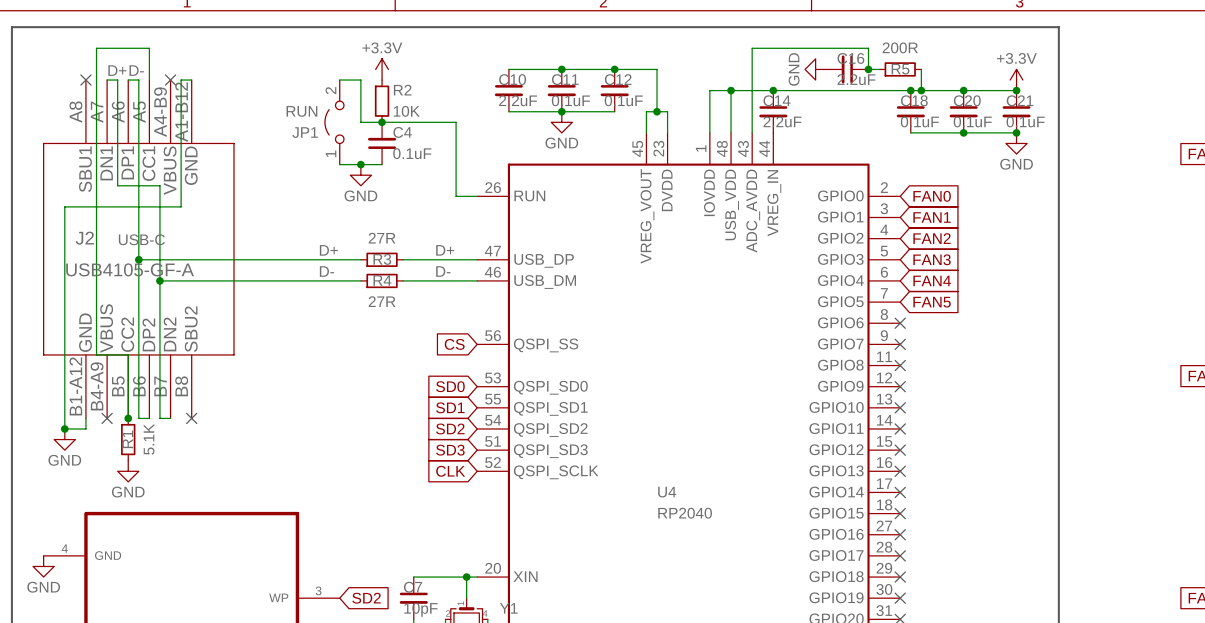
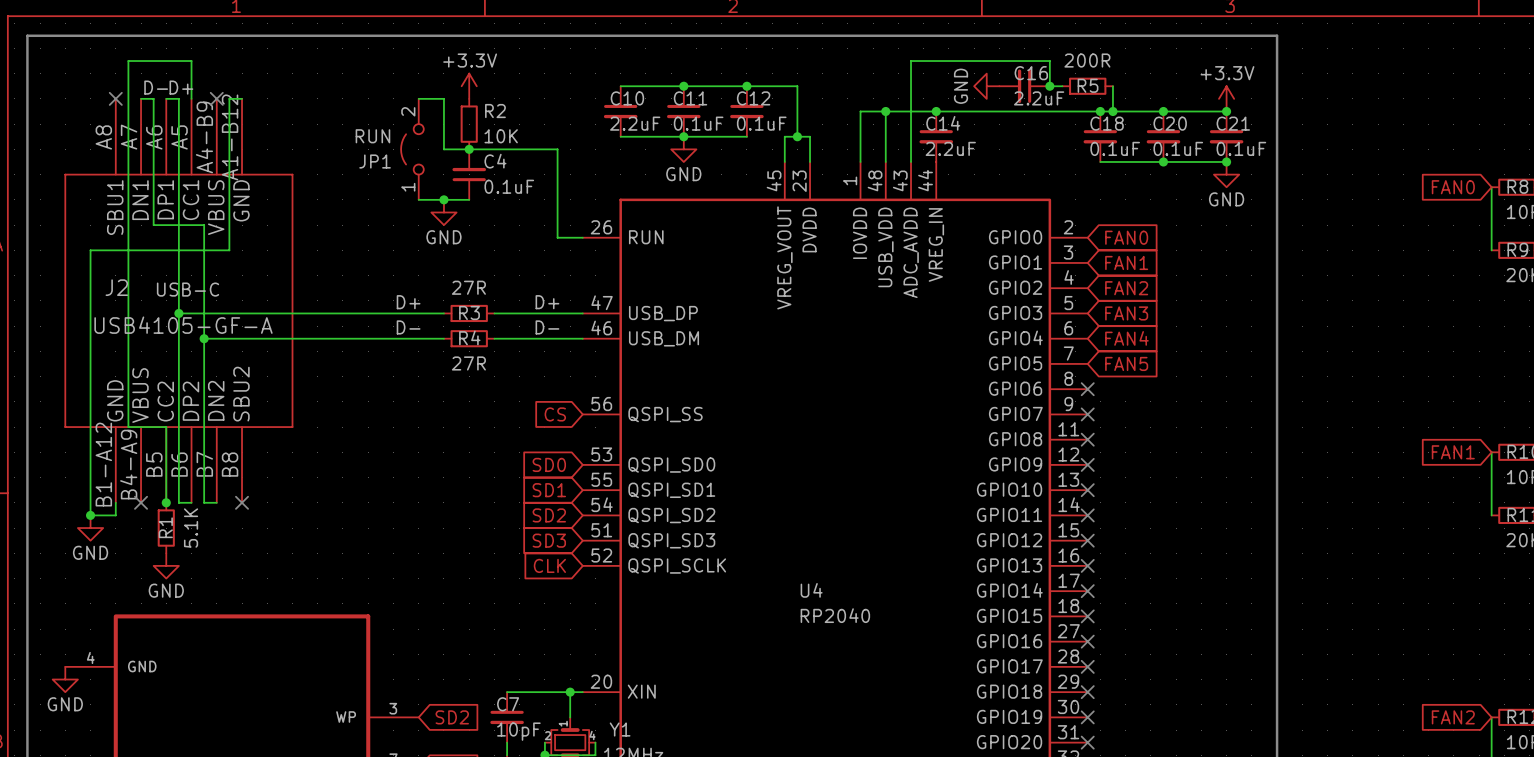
label: D+ (117, 70) -> D- (156, 87)
label: D- (136, 70) -> D+ (181, 87)

